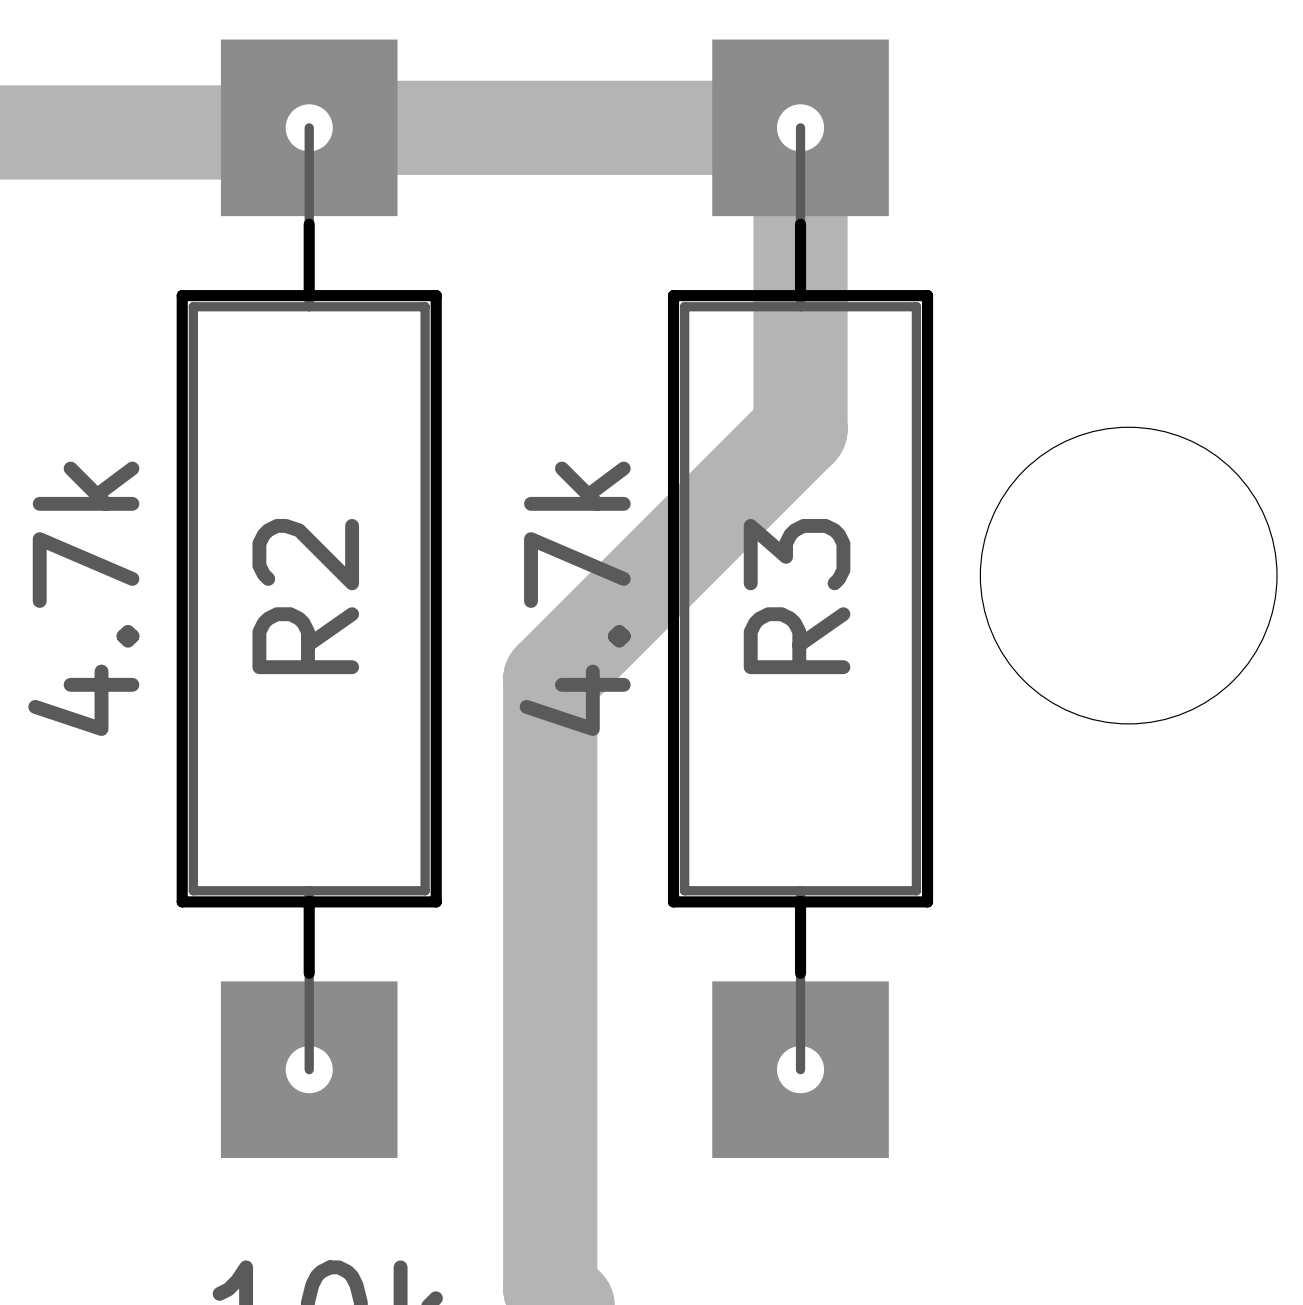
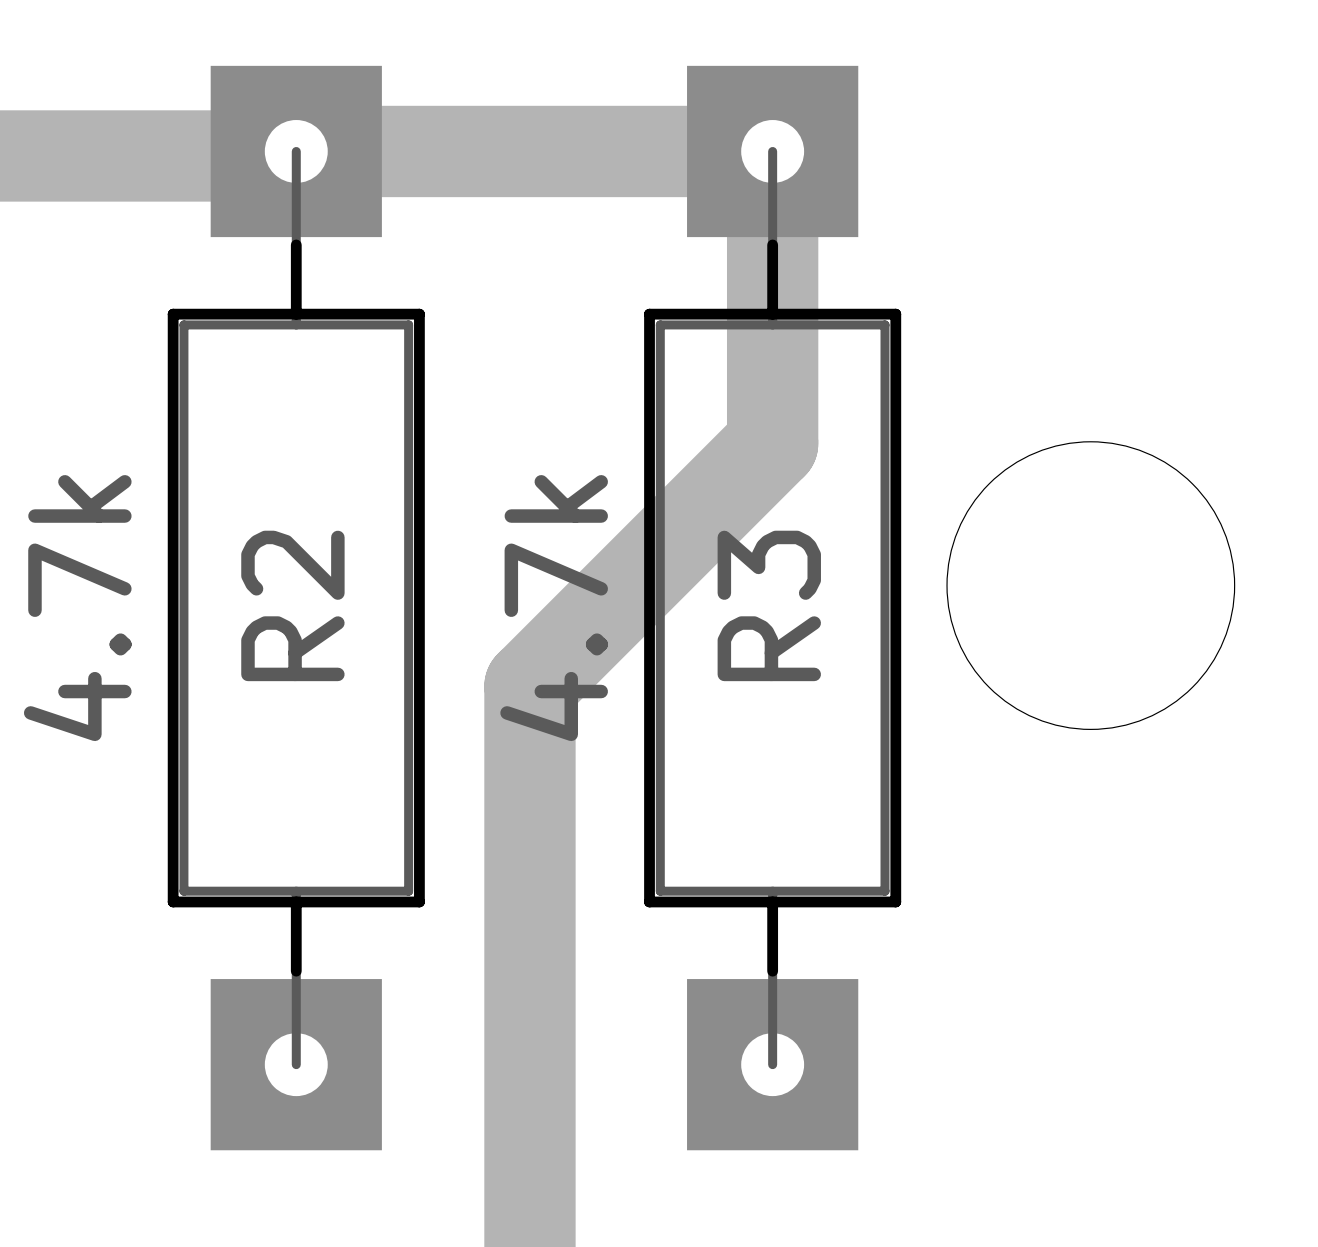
R2 footprint: [176, 39, 442, 1158] -> [167, 65, 425, 1151]
R3 footprint: [667, 39, 934, 1158] -> [644, 65, 902, 1151]

